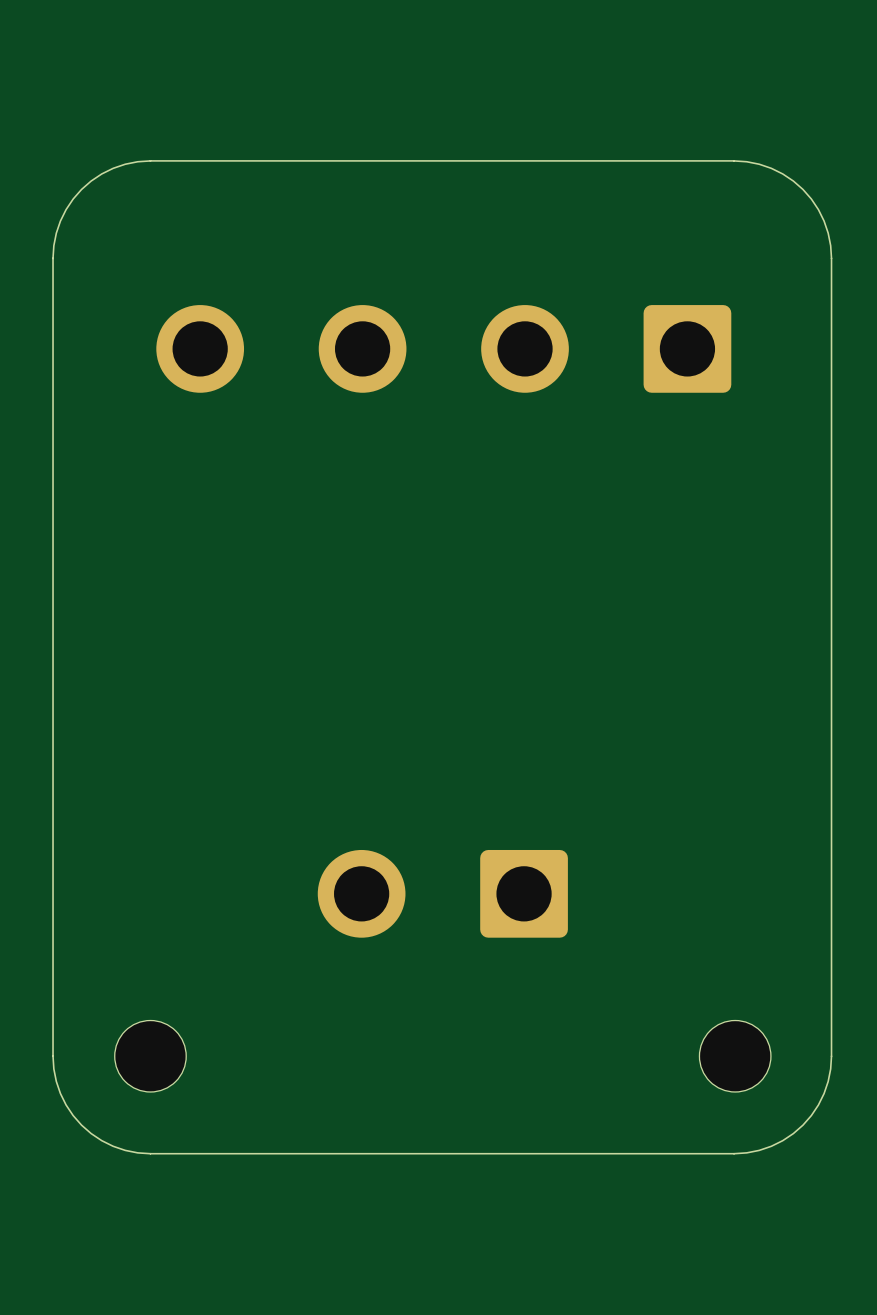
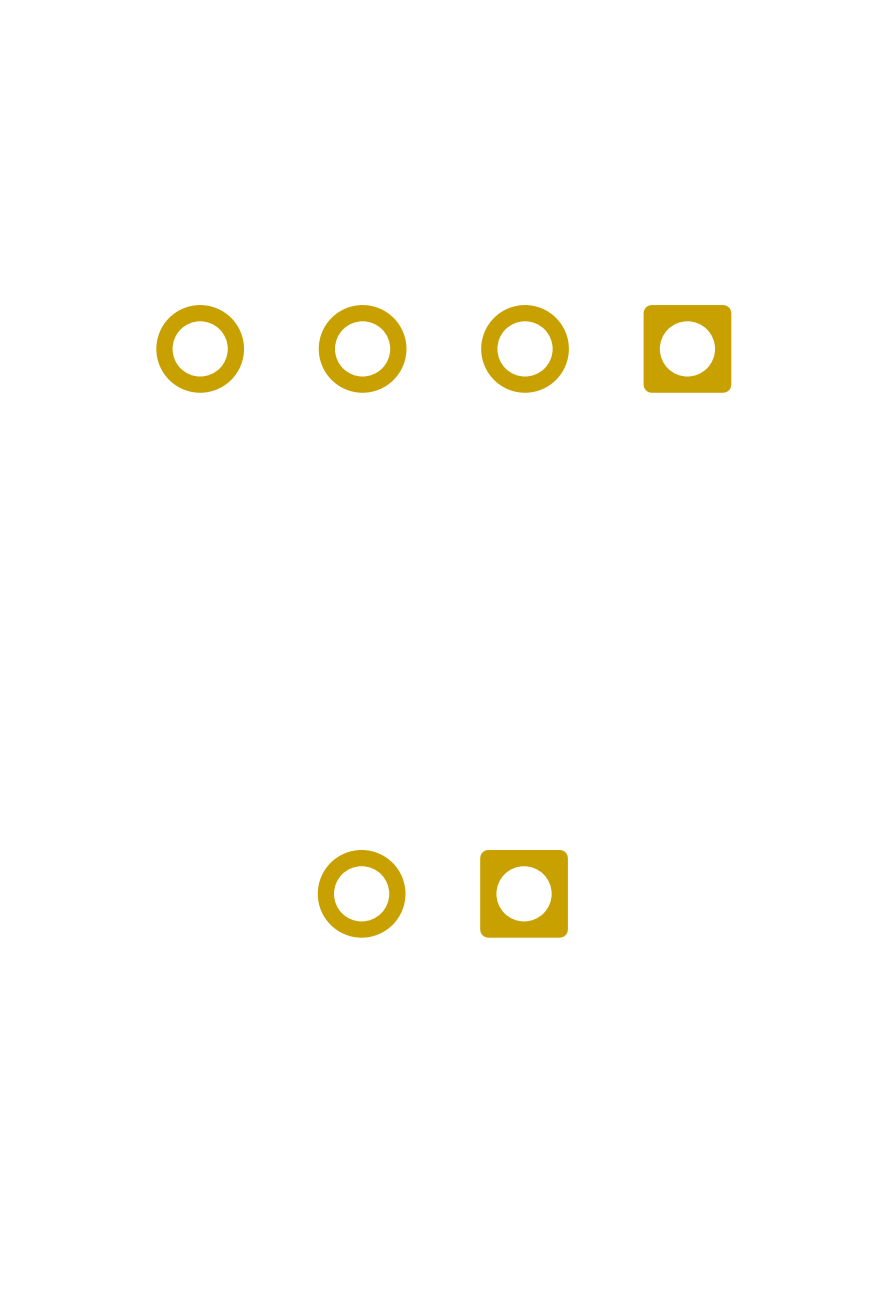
board edge: (734, 160) (137, 161) (125, 164) (101, 173) (81, 189) (66, 209) (56, 233) (53, 258) (53, 1056) (56, 1081) (66, 1104) (81, 1125) (101, 1140) (125, 1150) (150, 1153) (734, 1153) (759, 1150) (782, 1140) (802, 1125) (818, 1104) (828, 1081) (831, 1056) (830, 245) (824, 221) (811, 199) (802, 189) (782, 173) (771, 168) (759, 164) (734, 160) -> none
part: (150, 1056) -> none
part: (735, 1056) -> none

